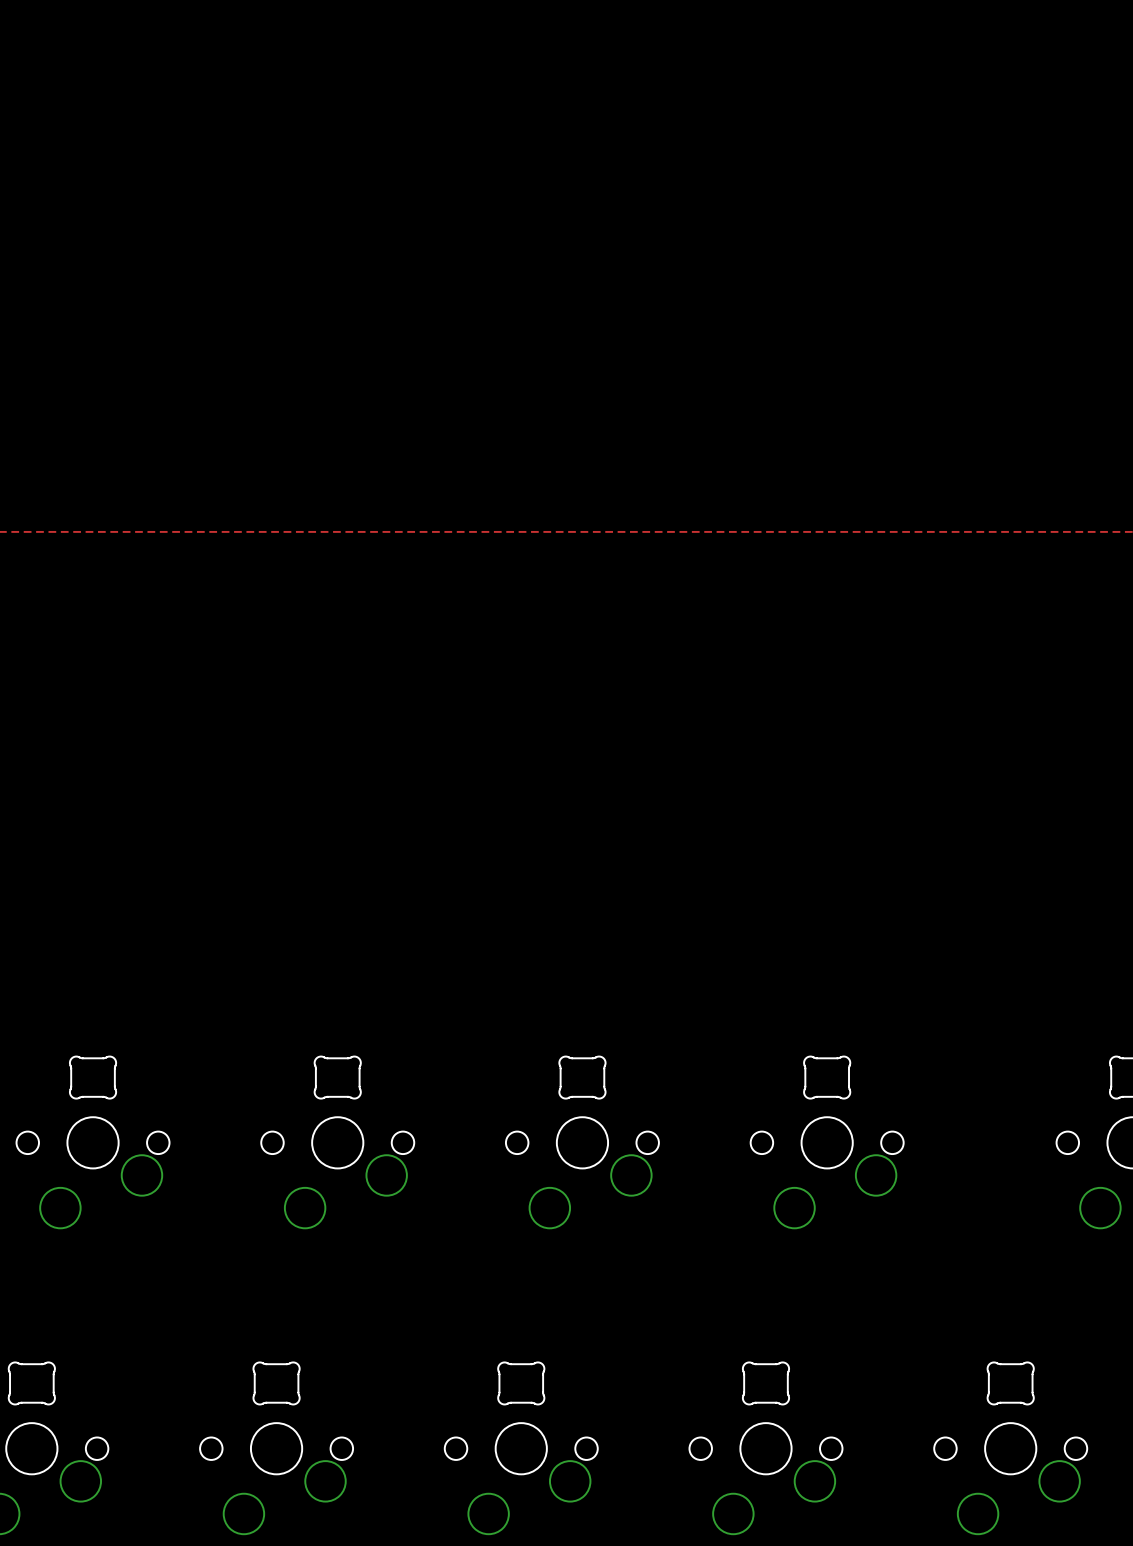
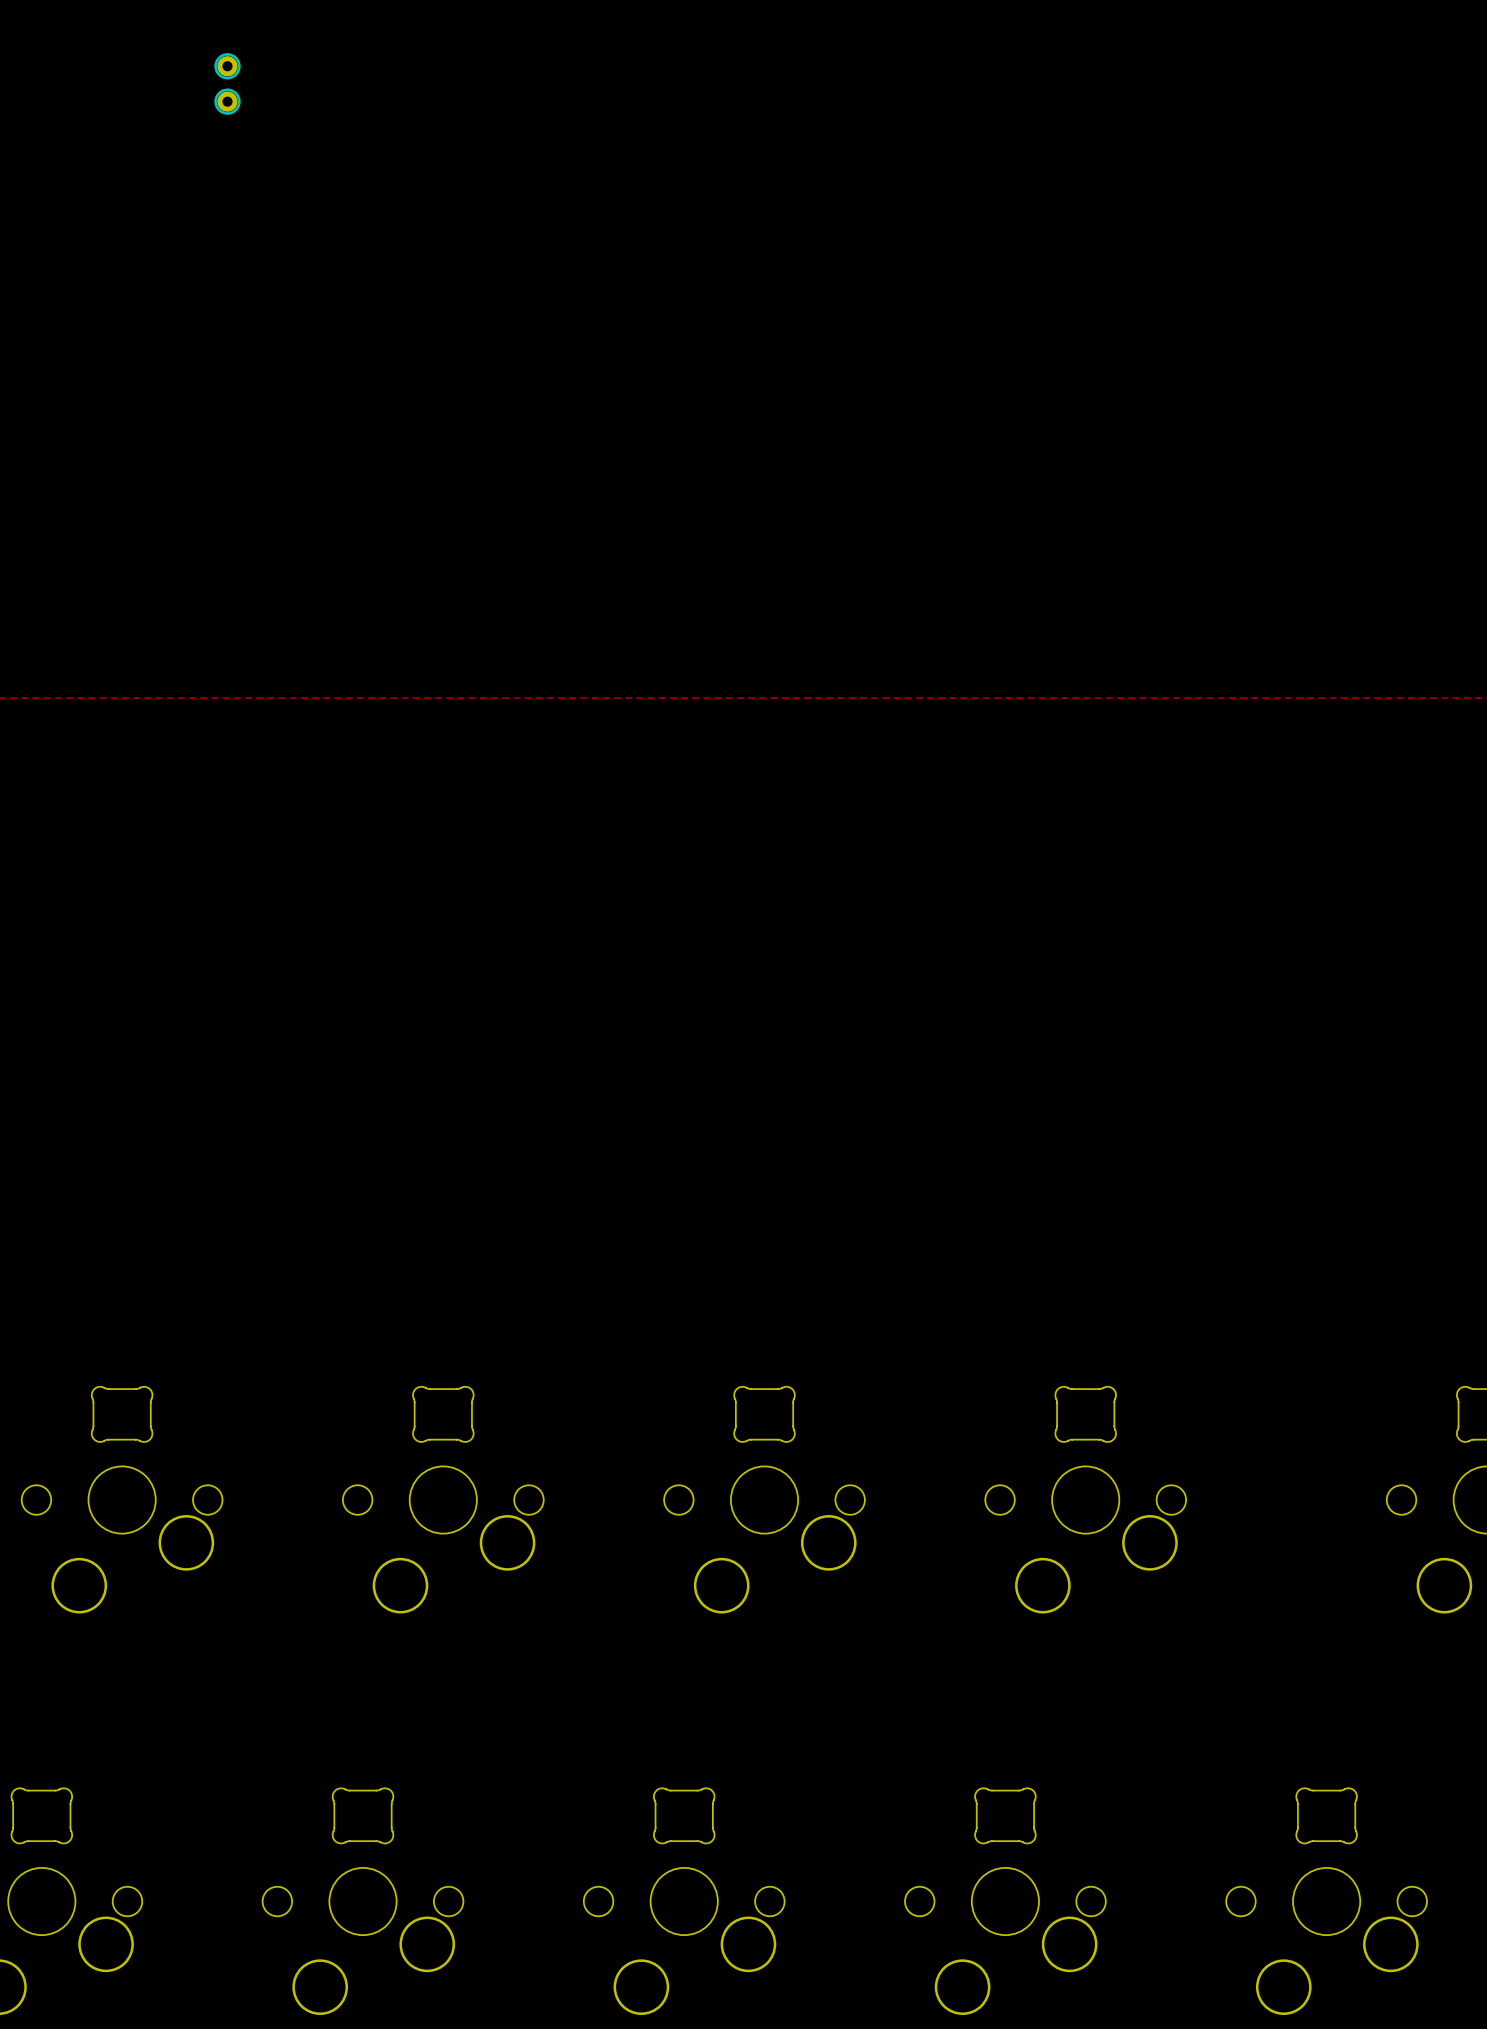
part: none -> (227, 66)
part: none -> (227, 101)

